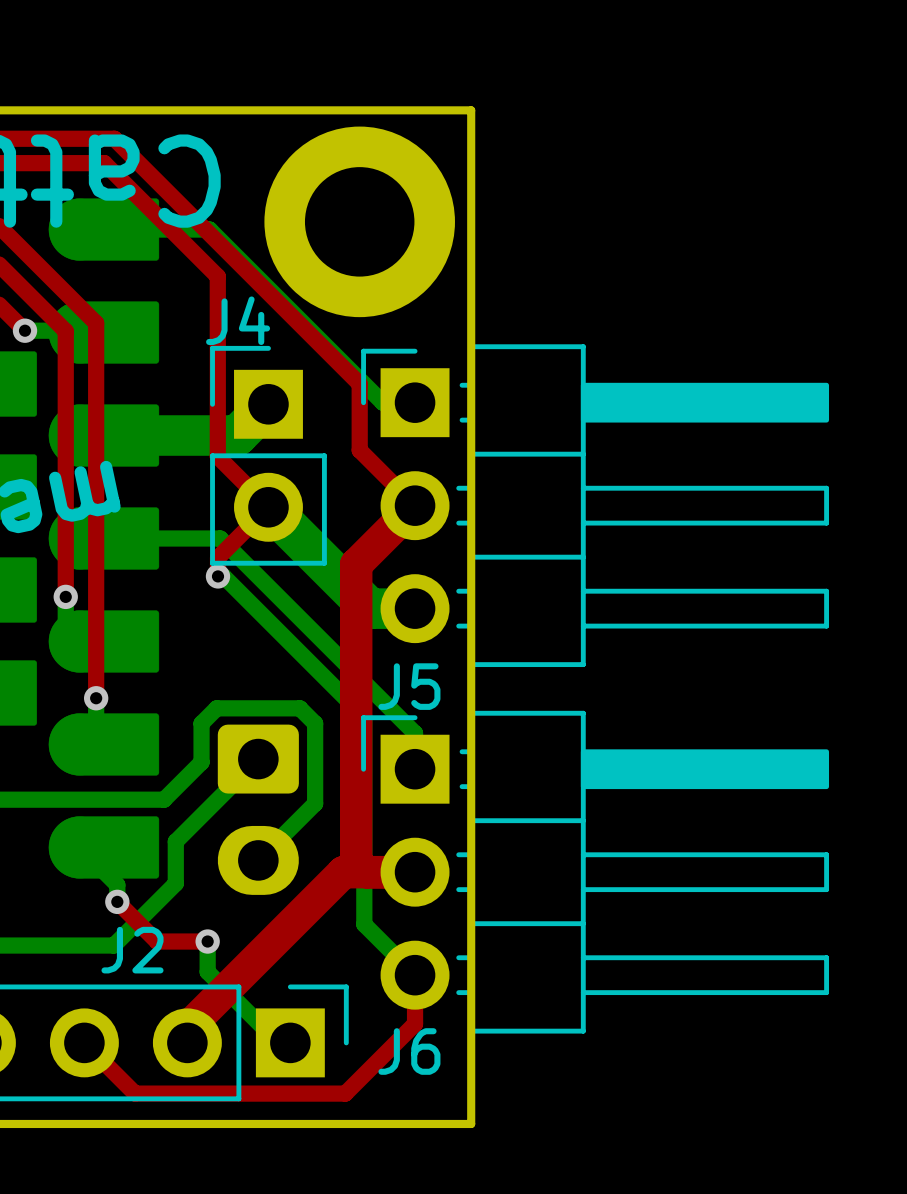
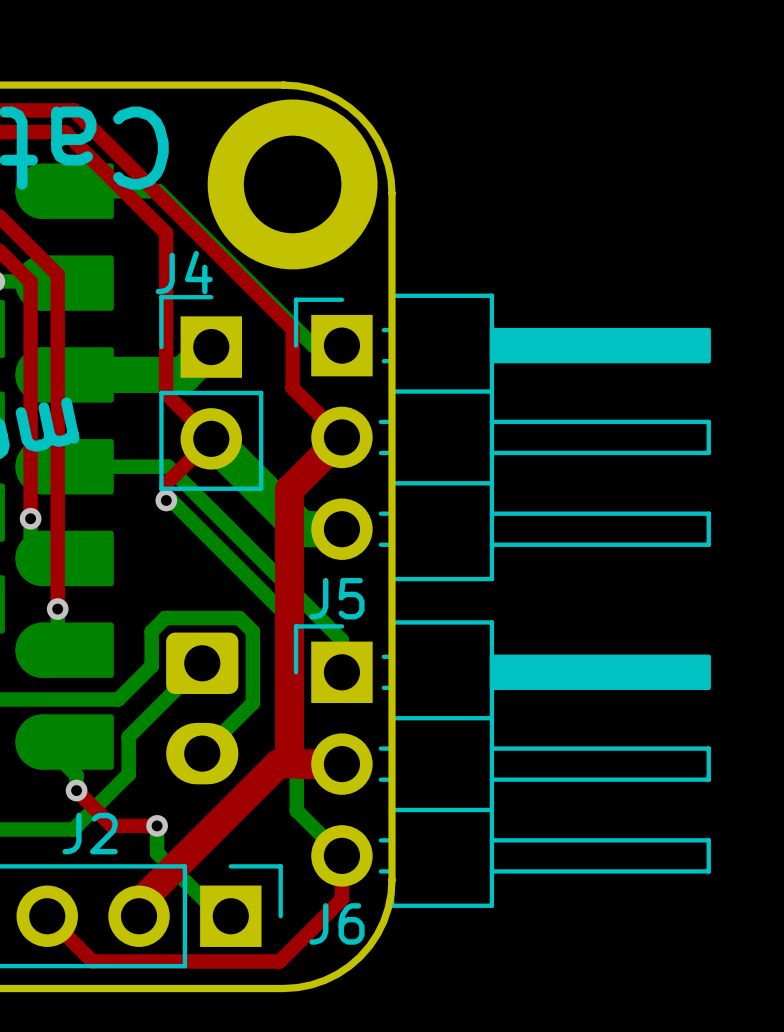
board edge: (349, 110) (471, 110) (471, 231) -> (283, 85) (297, 86) (325, 93) (349, 107) (360, 116) (369, 127) (383, 152) (388, 165) (392, 193)
board edge: (471, 1002) (471, 1123) (349, 1123) -> (392, 880) (391, 894) (383, 921) (369, 946) (360, 956) (337, 973) (325, 980) (311, 984) (283, 988)

